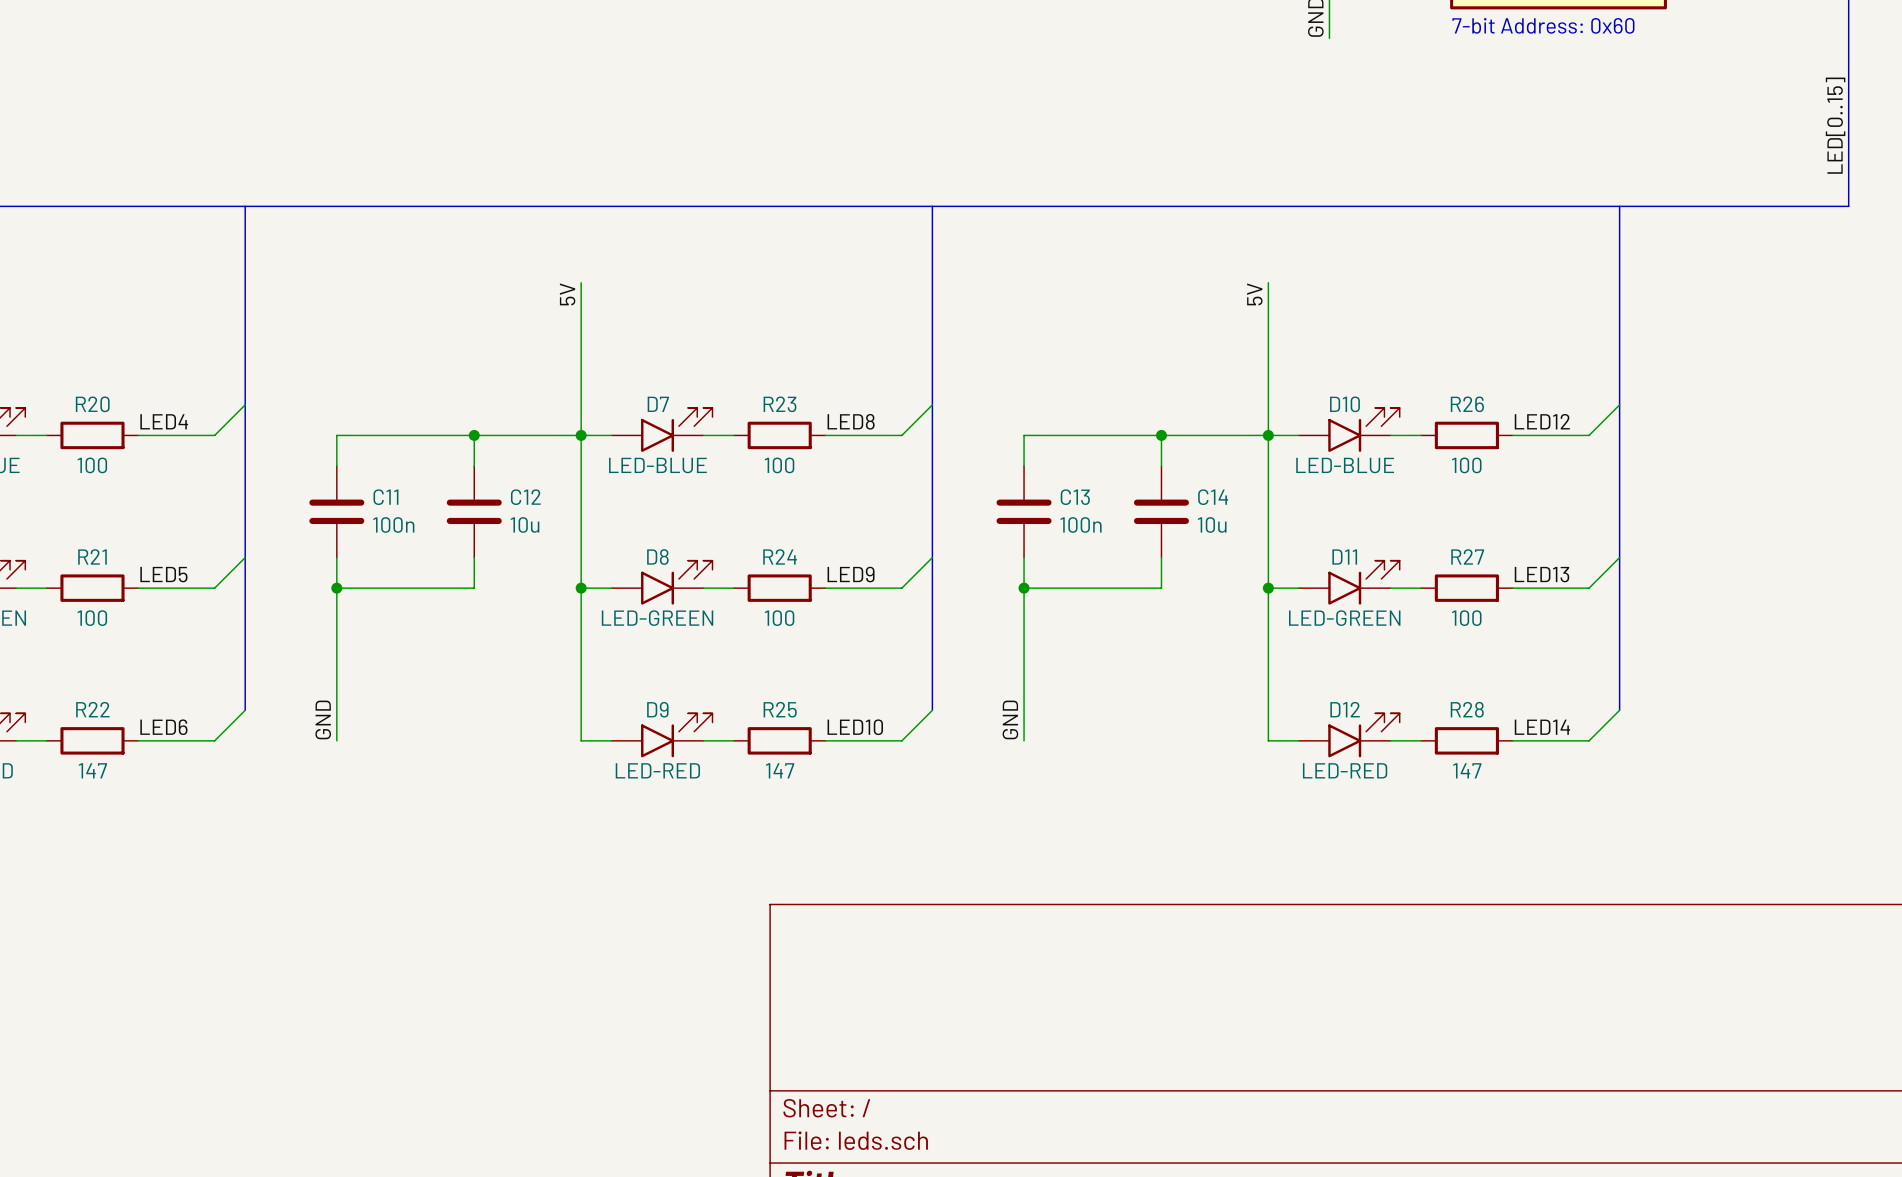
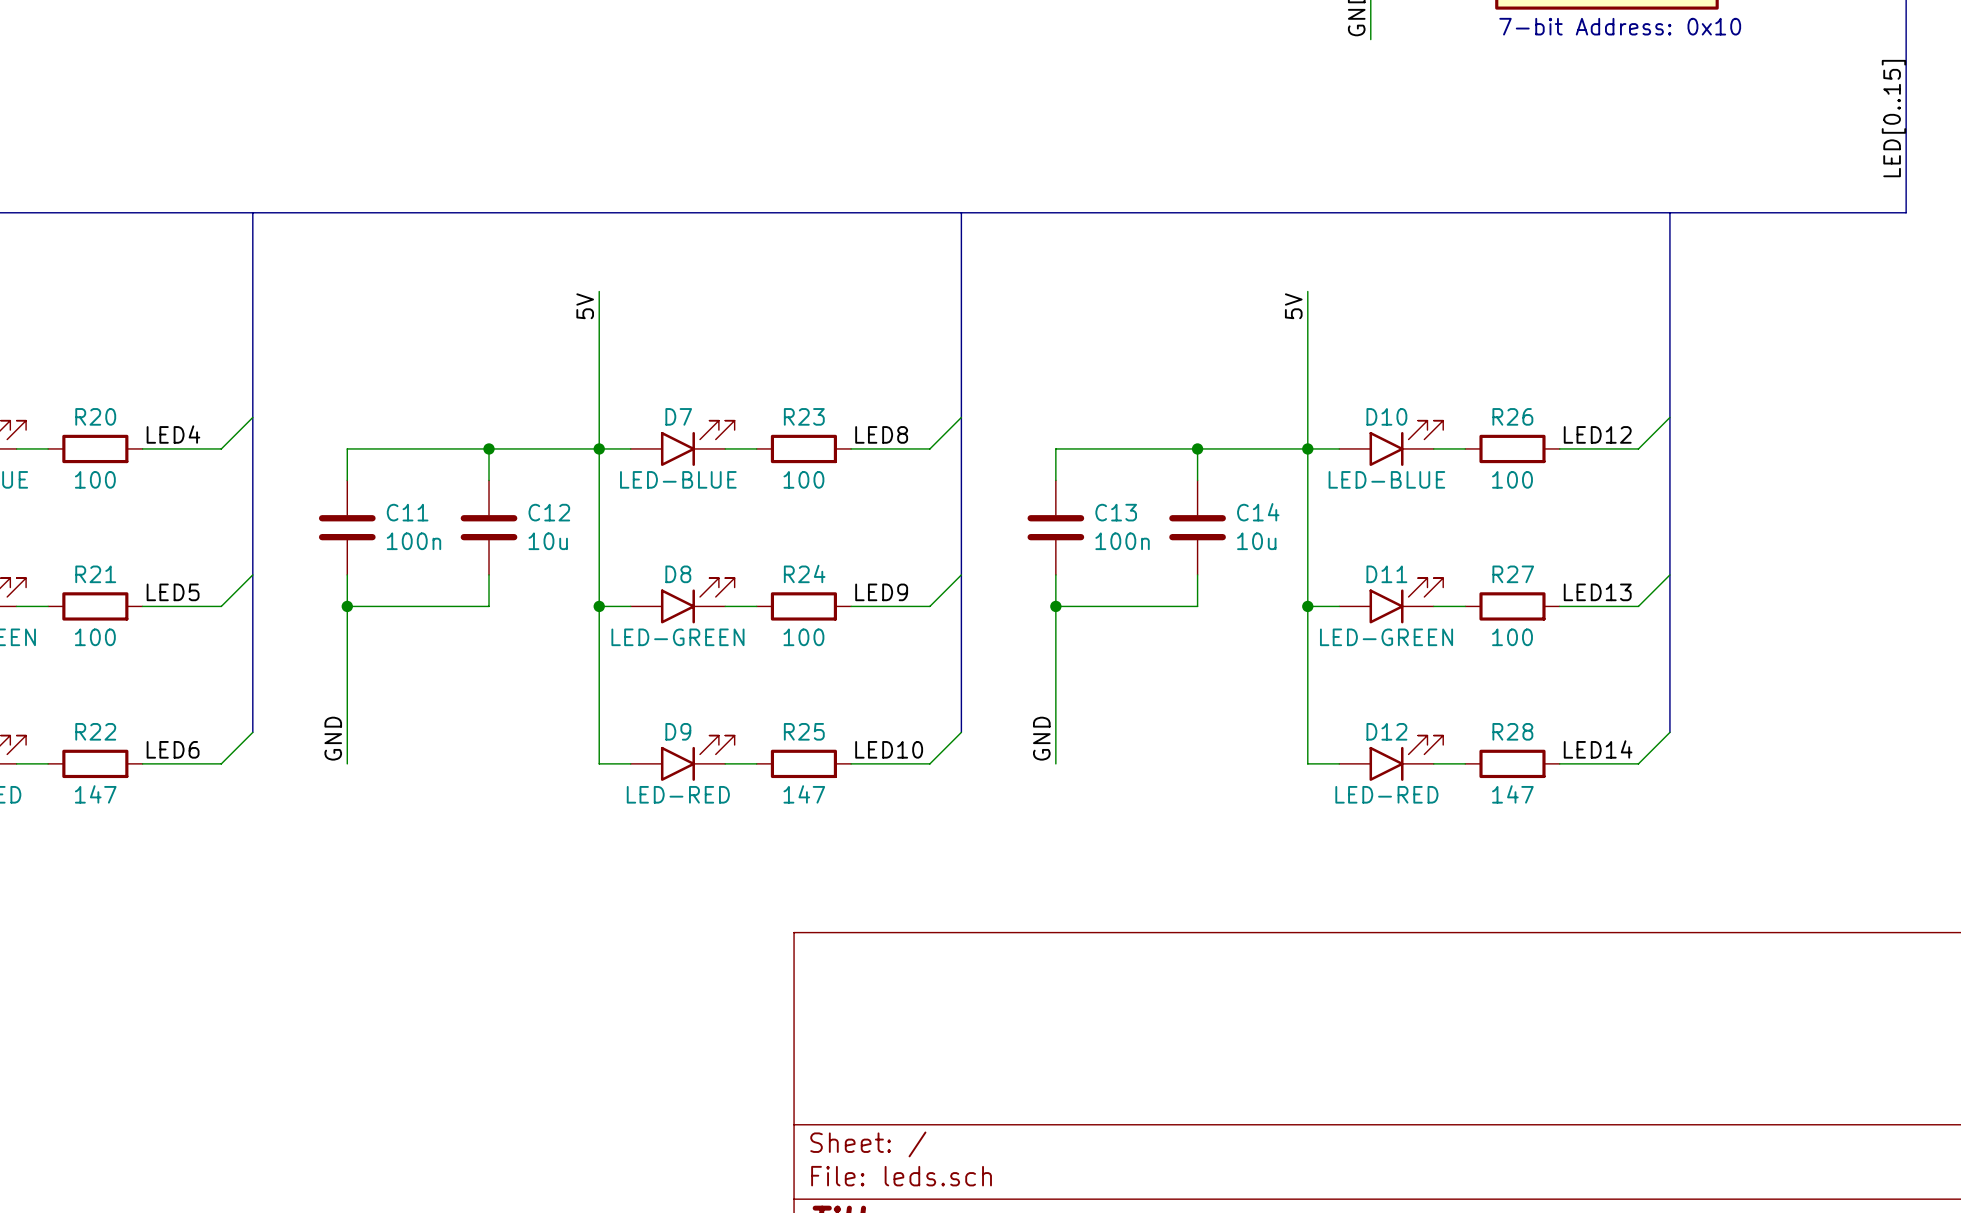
text: 7-bit Address: 0x60 (1543, 25) -> 7-bit Address: 0x10 (1620, 26)

